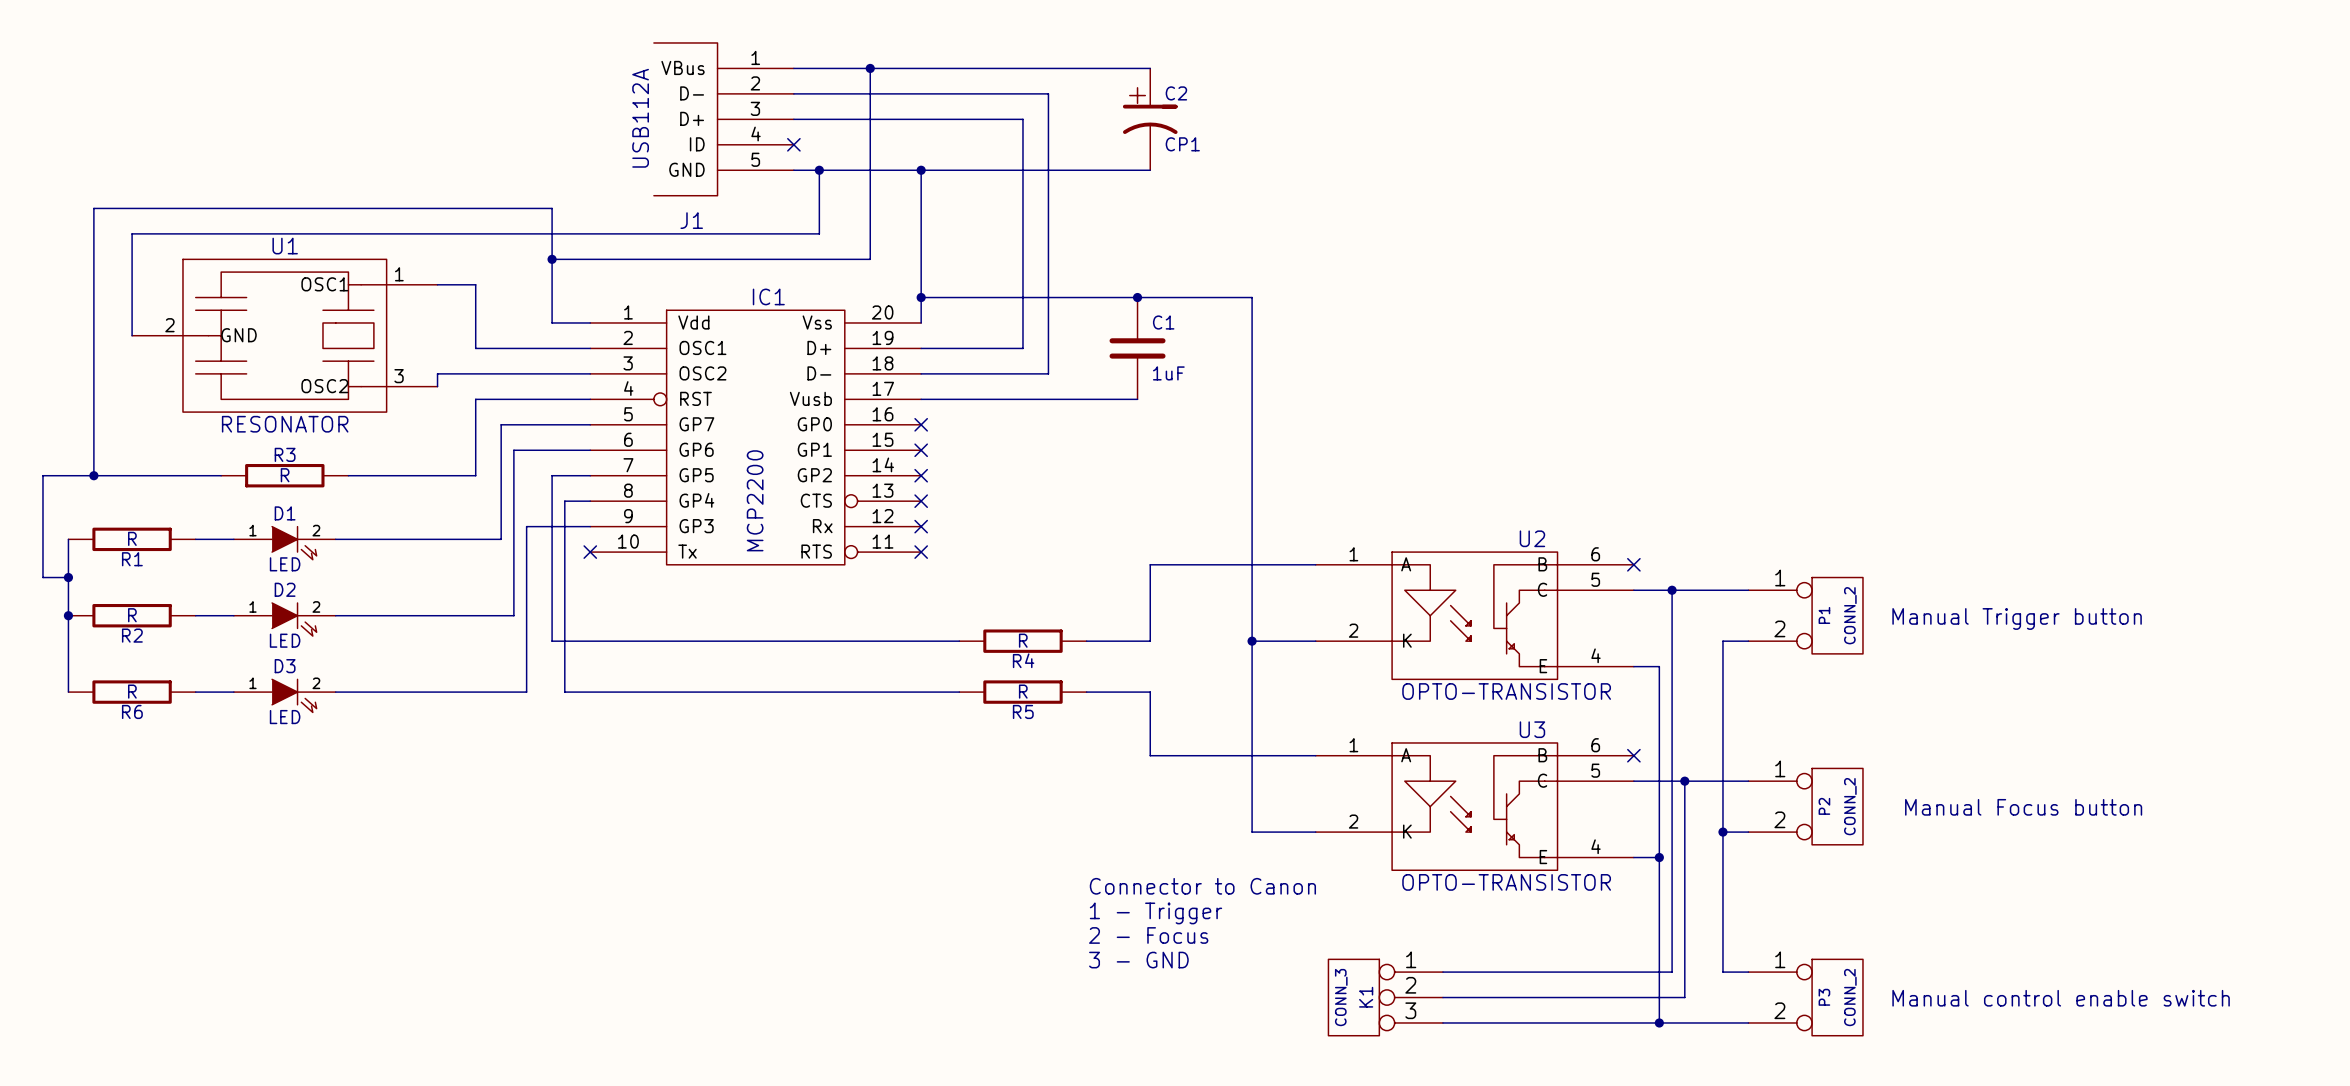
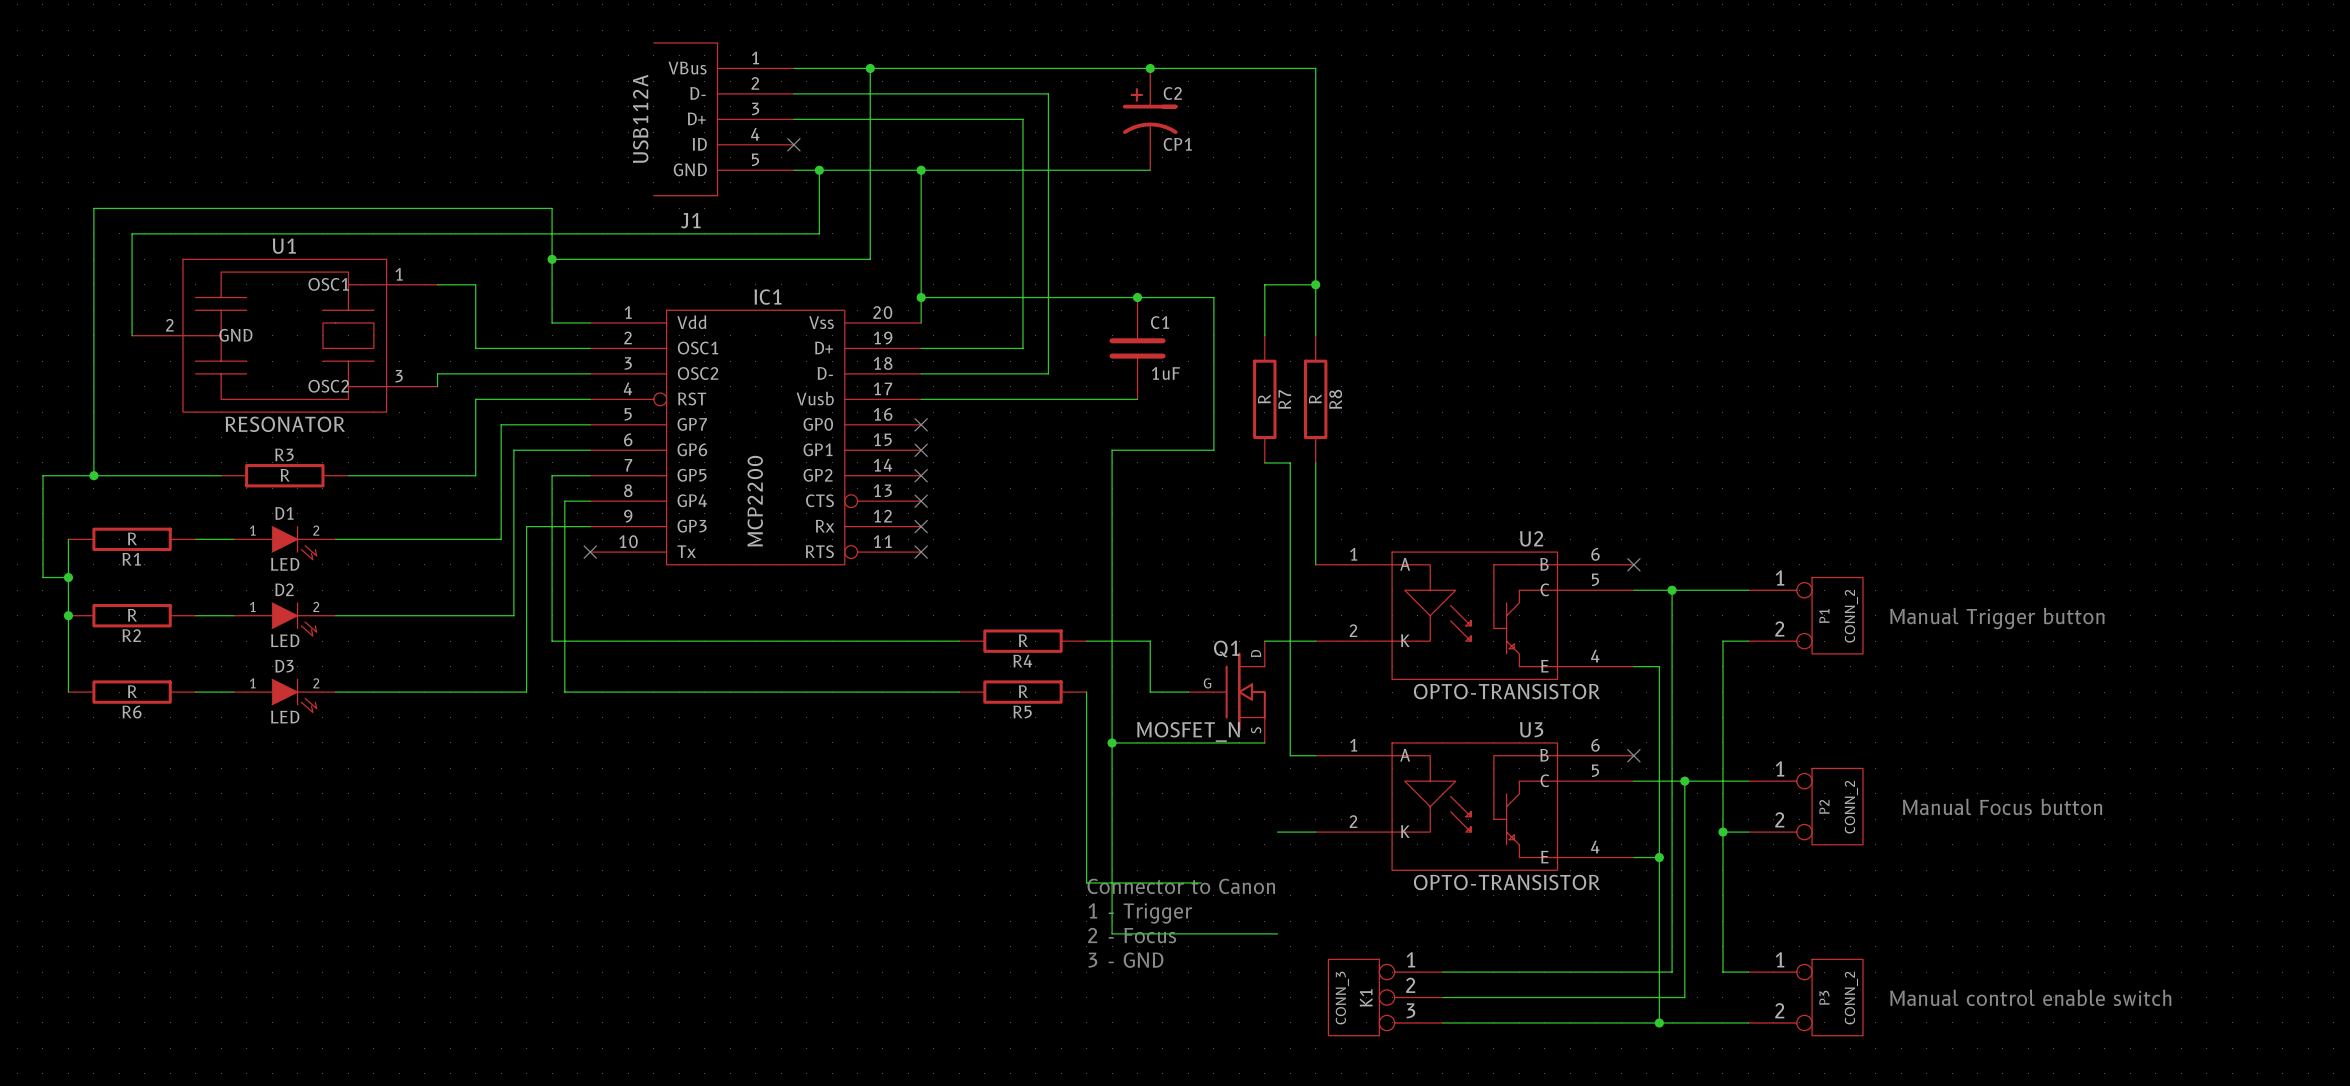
wire: none -> (1150, 68) (1315, 68) (1315, 335)
junction: none -> (1150, 68)
wire: none -> (1315, 284) (1264, 284) (1264, 335)
junction: none -> (1315, 284)
wire: (1213, 297) (1252, 297) (1252, 832) (1277, 832) -> (1213, 297) (1213, 450) (1112, 450) (1112, 933) (1277, 933)
R7: none -> R (1264, 399)
R8: none -> R (1315, 399)
wire: none -> (1264, 462) (1290, 462) (1290, 755)
wire: none -> (1315, 462) (1315, 564)
wire: (1315, 564) (1150, 564) (1150, 641) -> (1188, 692) (1150, 692) (1150, 641)
wire: (1252, 641) (1264, 641) -> none
junction: (1252, 641) -> none
wire: (1086, 692) (1150, 692) (1150, 755) (1290, 755) -> (1086, 692) (1086, 882) (1201, 882)
Q1: none -> MOSFET_N (1227, 692)
wire: none -> (1112, 742) (1264, 742)
junction: none -> (1112, 742)

